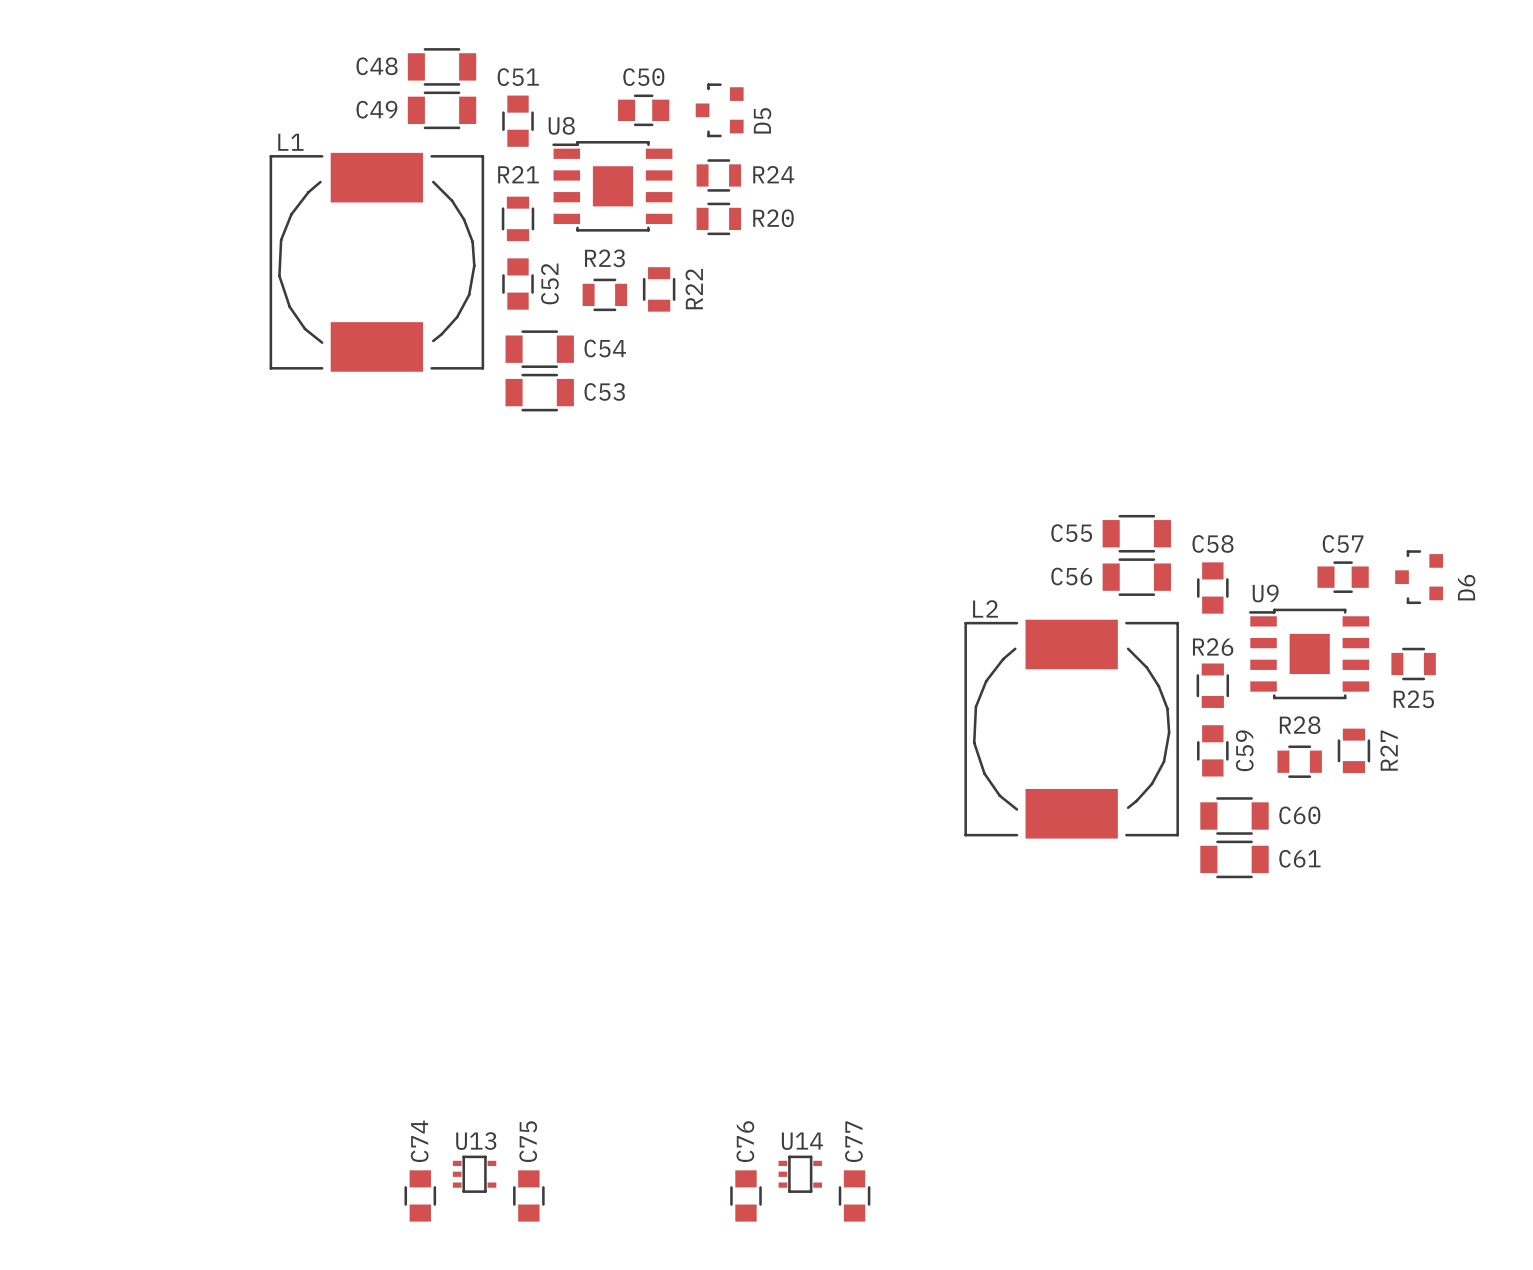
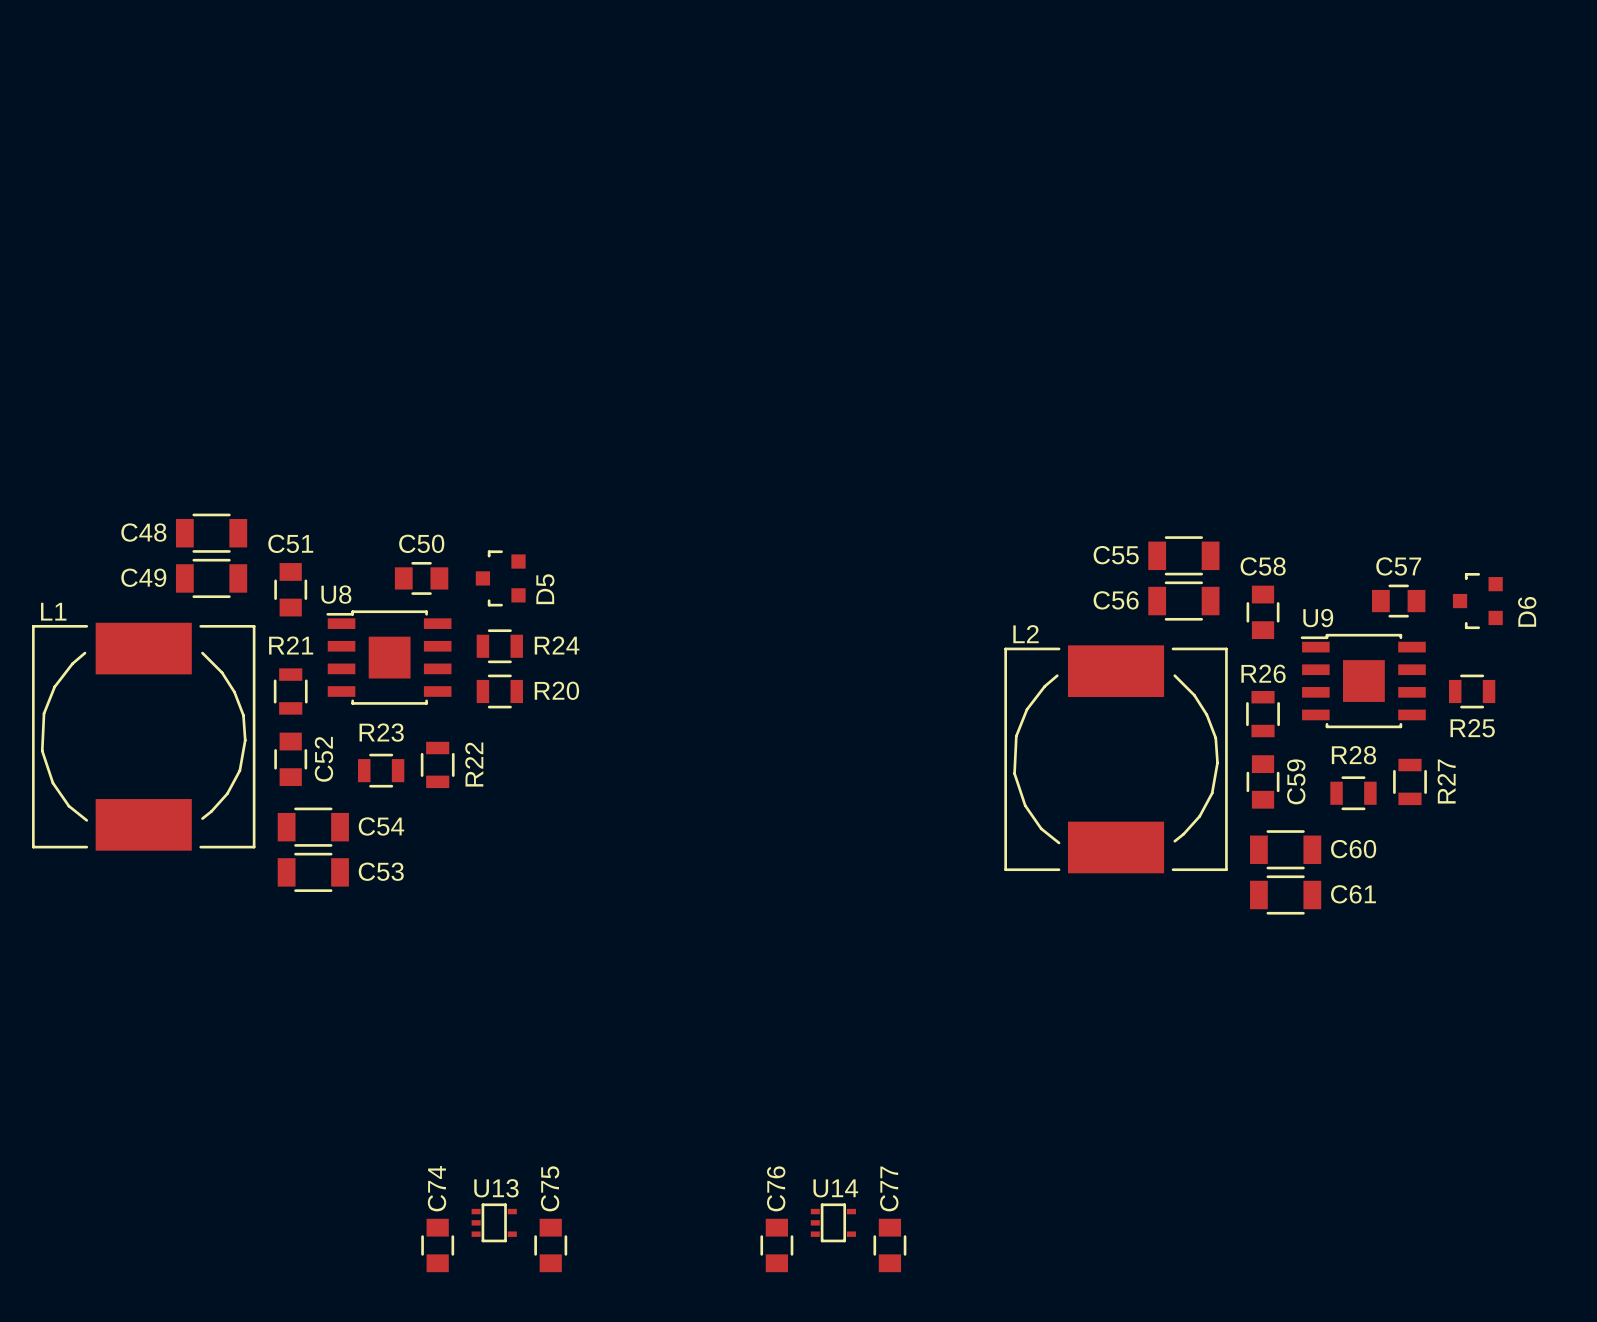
C48 position: (442, 66) -> (211, 533)
C49 position: (442, 110) -> (211, 578)
C50 position: (643, 110) -> (421, 578)
D5 position: (719, 110) -> (500, 578)
C51 position: (518, 121) -> (290, 589)
R24 position: (718, 175) -> (499, 646)
U8 position: (612, 186) -> (388, 657)
R21 position: (518, 218) -> (290, 691)
R20 position: (718, 218) -> (499, 691)
L1 position: (376, 262) -> (143, 736)
C52 position: (518, 284) -> (290, 759)
R22 position: (659, 289) -> (437, 764)
R23 position: (604, 294) -> (381, 770)
C54 position: (539, 349) -> (313, 827)
C53 position: (539, 392) -> (313, 872)

